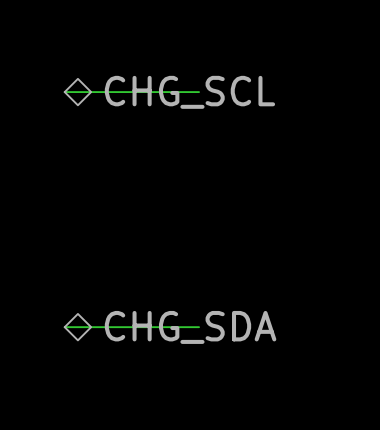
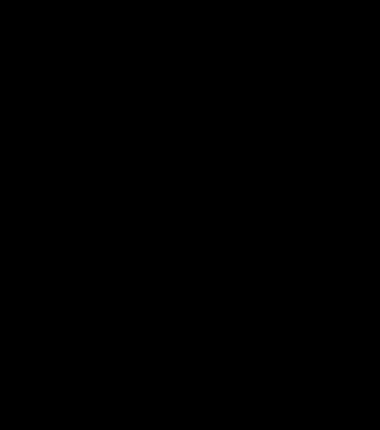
wire: (64, 92) (199, 92) -> none
hierarchical label: CHG_SCL (189, 92) -> none
wire: (64, 327) (199, 327) -> none
hierarchical label: CHG_SDA (190, 327) -> none

